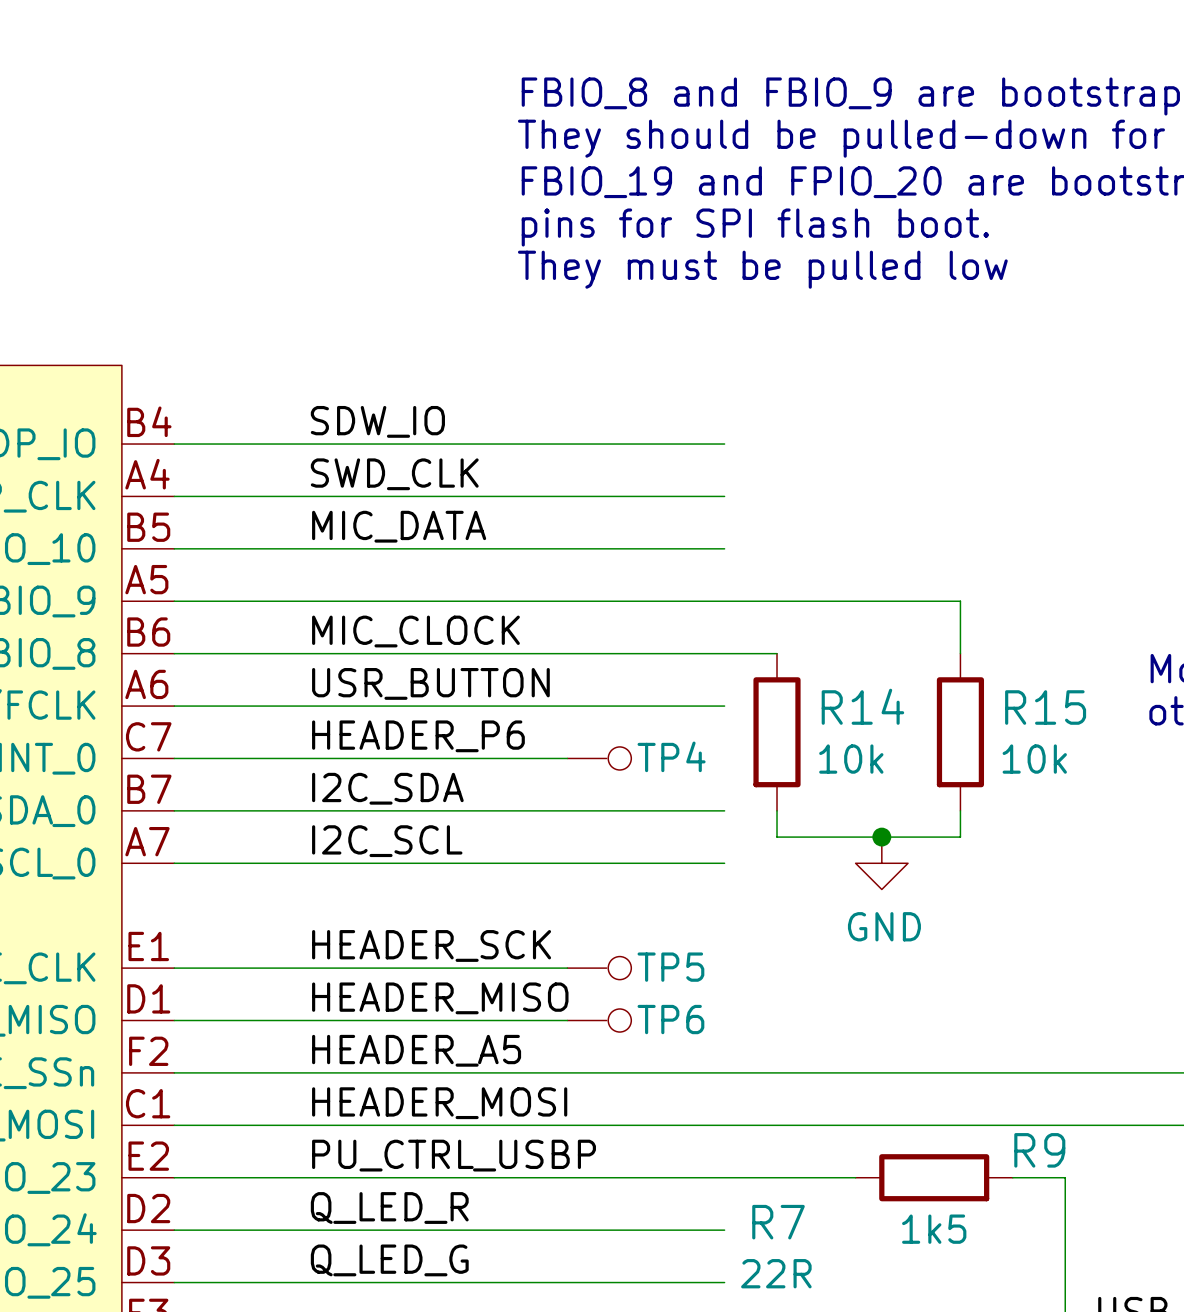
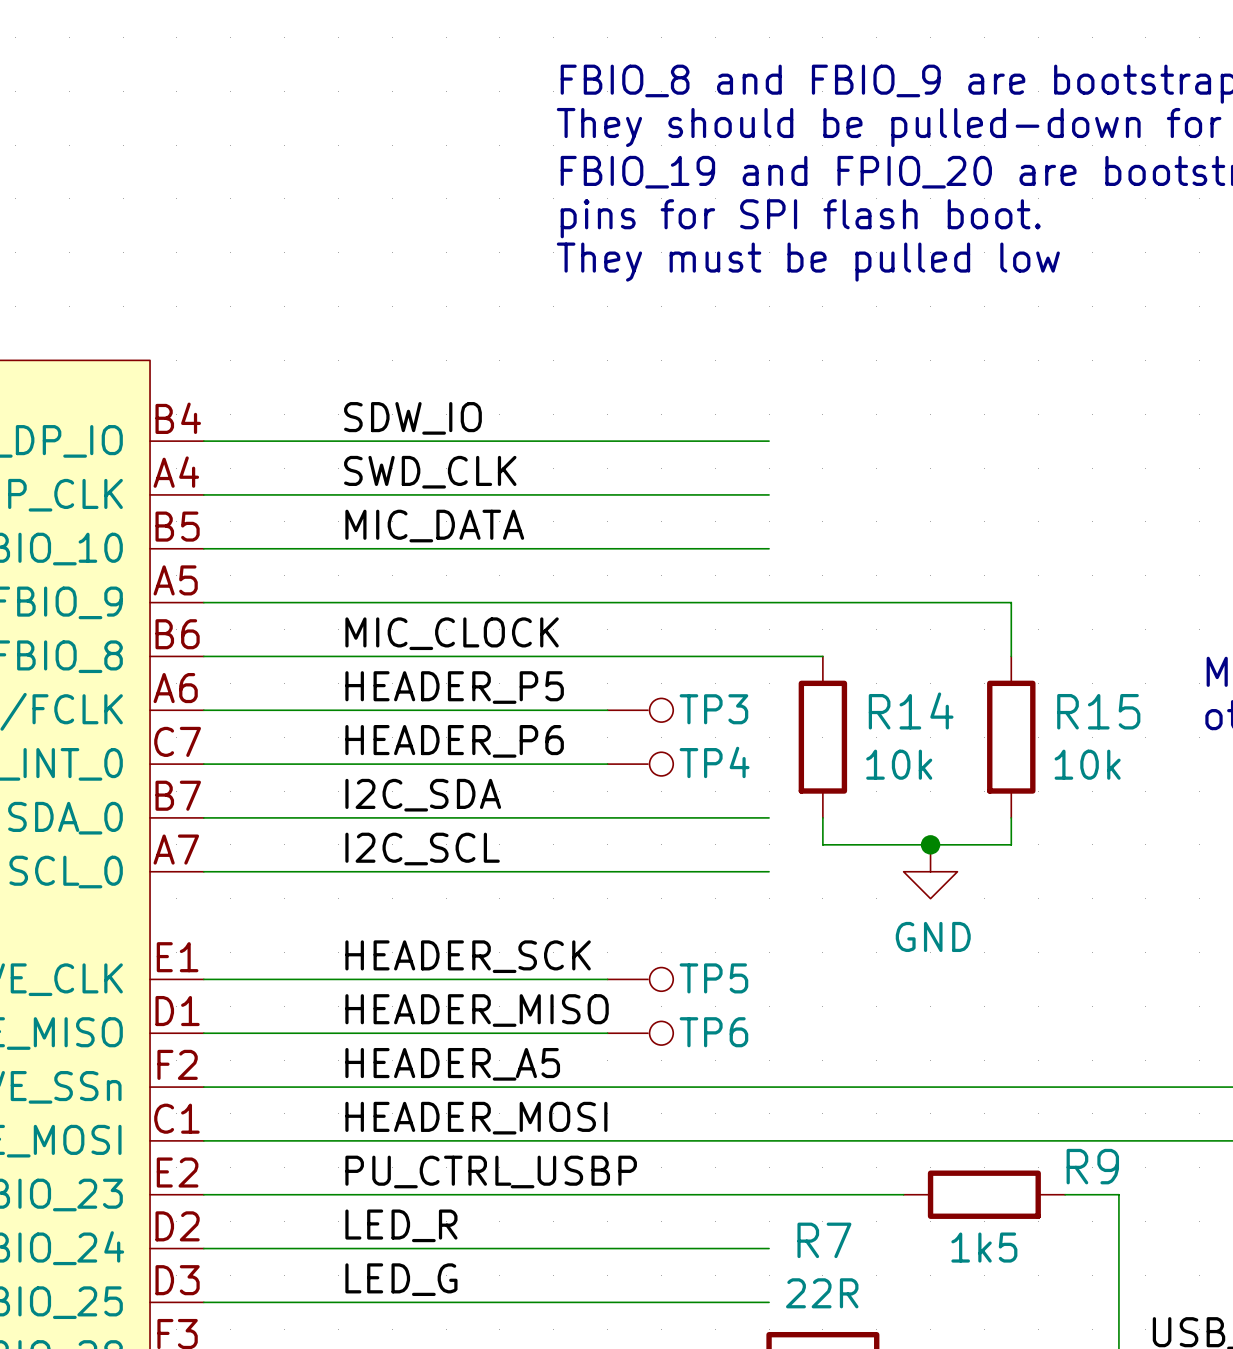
label: USR_BUTTON (430, 683) -> HEADER_P5 (454, 687)
wire: (567, 706) (724, 706) -> none
TP3: none -> (640, 710)
label: Q_LED_R (389, 1208) -> LED_R (401, 1225)
label: Q_LED_G (389, 1260) -> LED_G (401, 1279)

